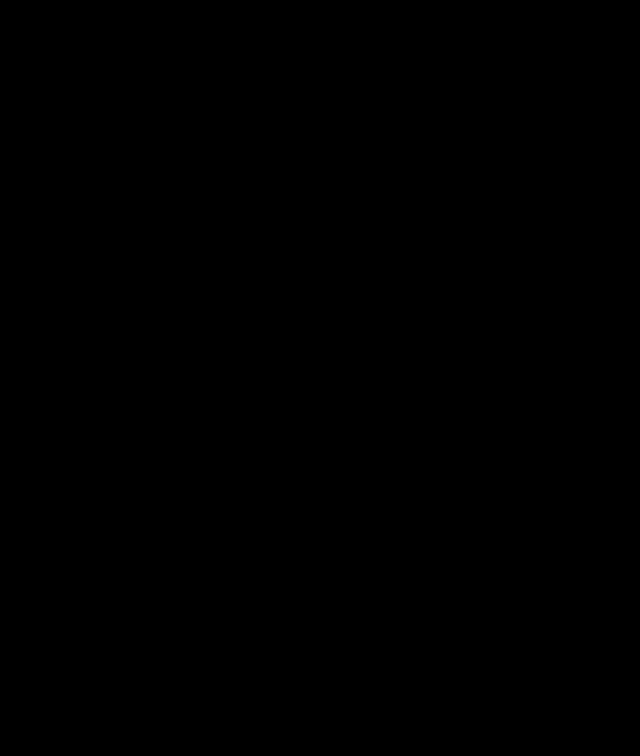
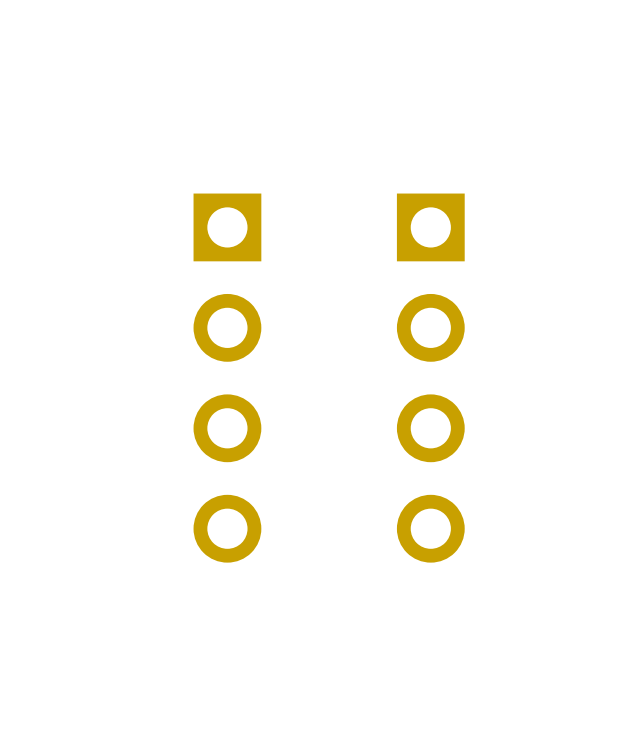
part: none -> (227, 378)
part: none -> (430, 378)

